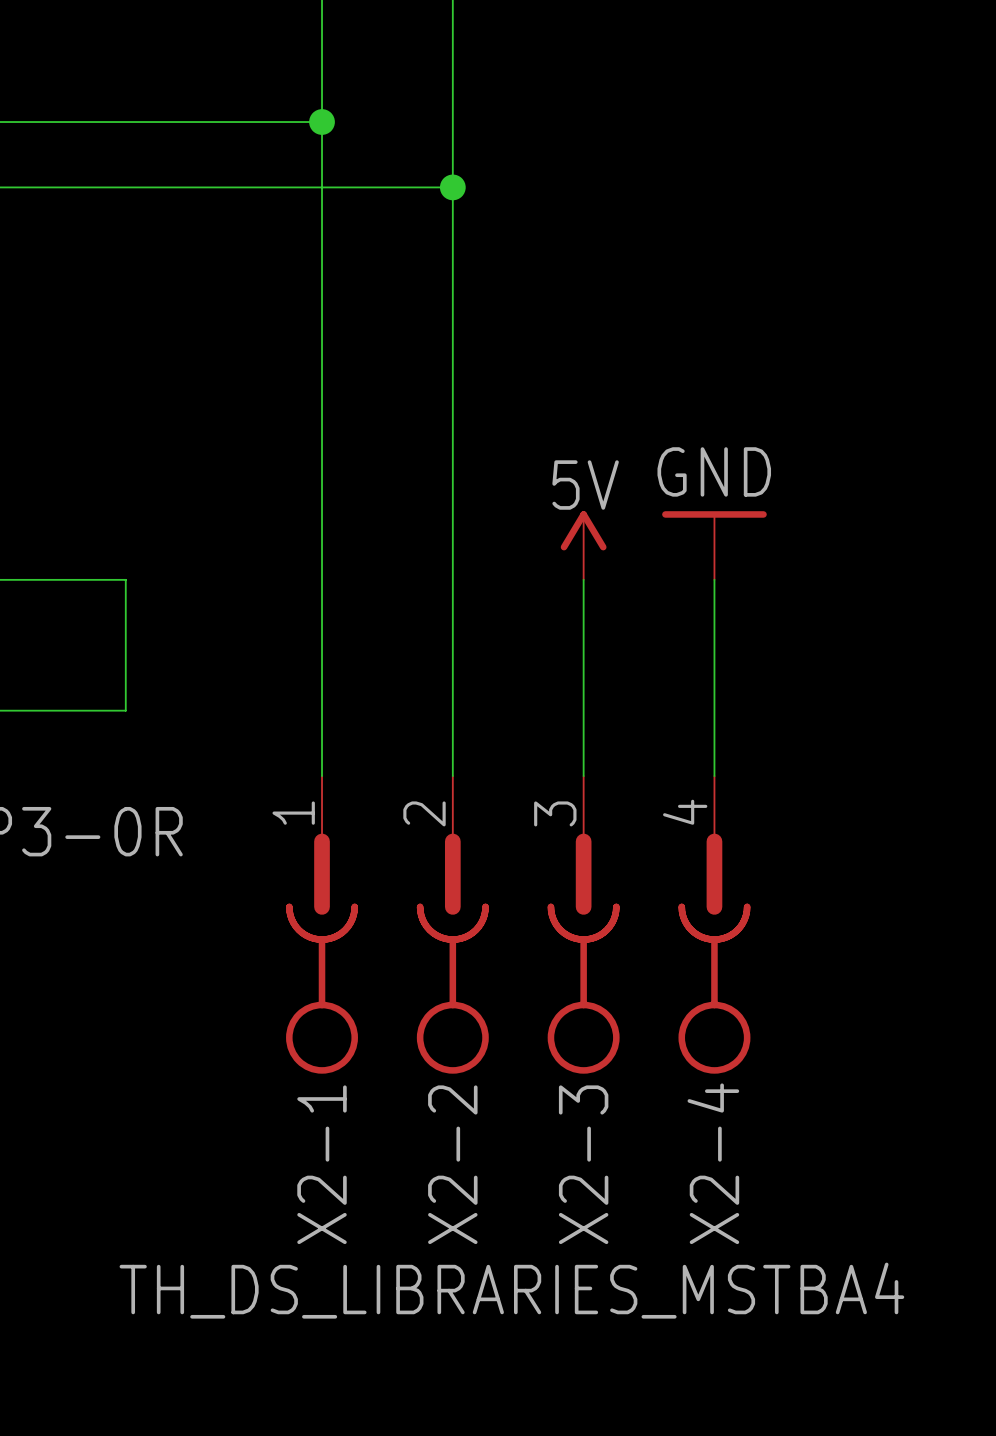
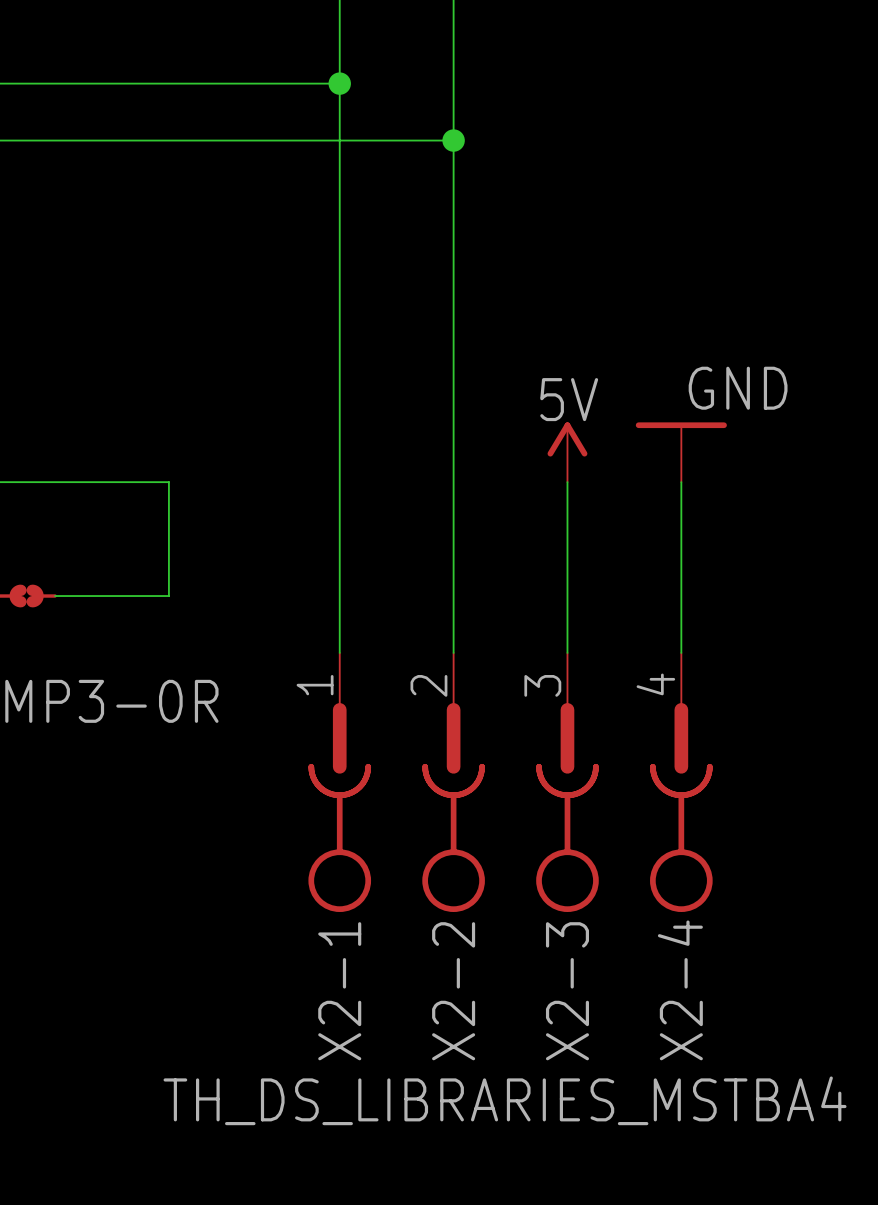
power symbol text position: GND (714, 471) -> GND (738, 388)

